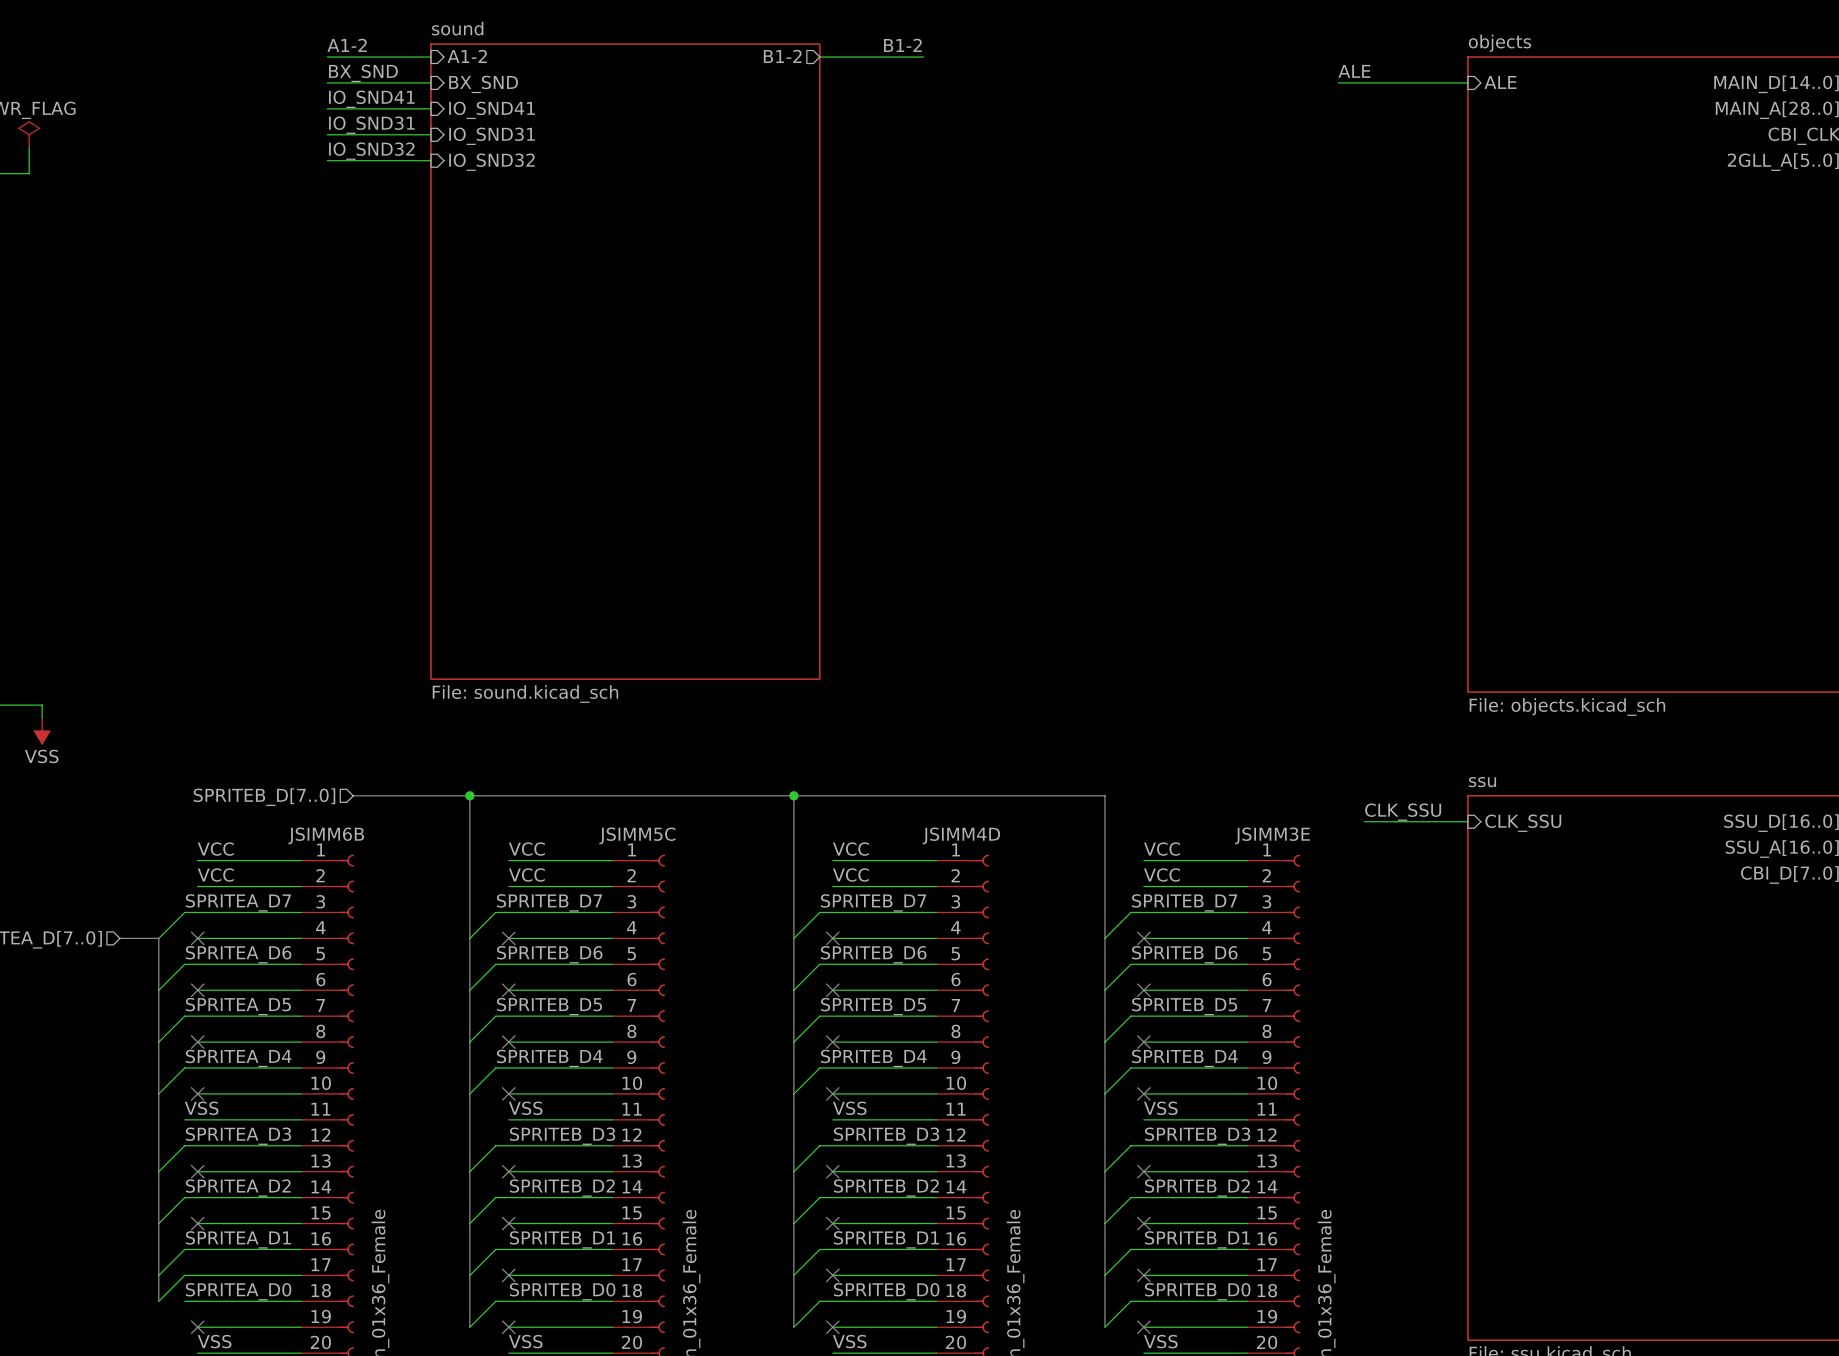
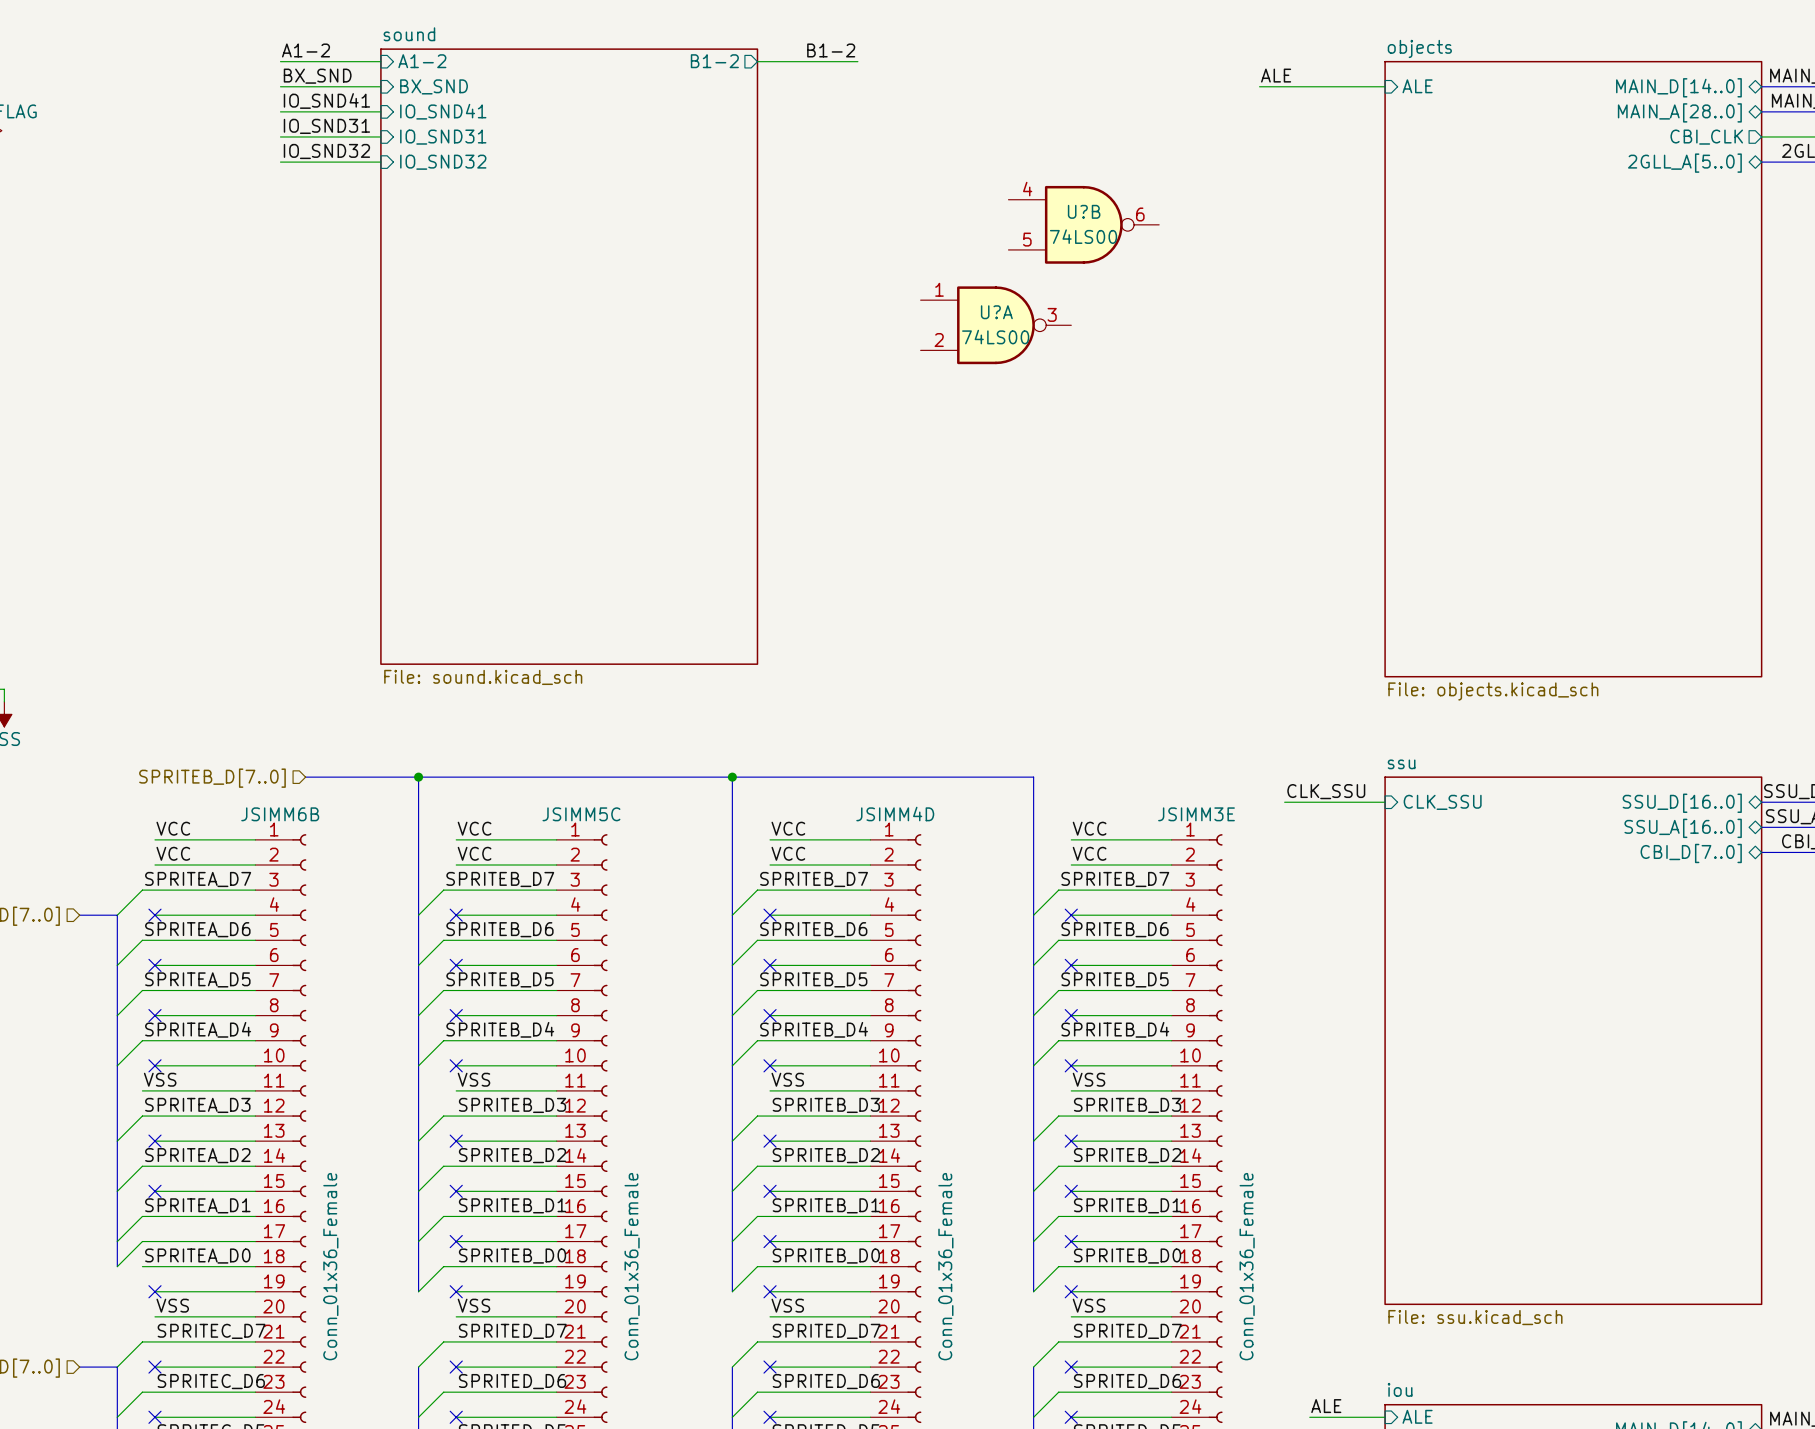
U?B: none -> 74LS00 (1083, 224)
U?A: none -> 74LS00 (995, 325)

